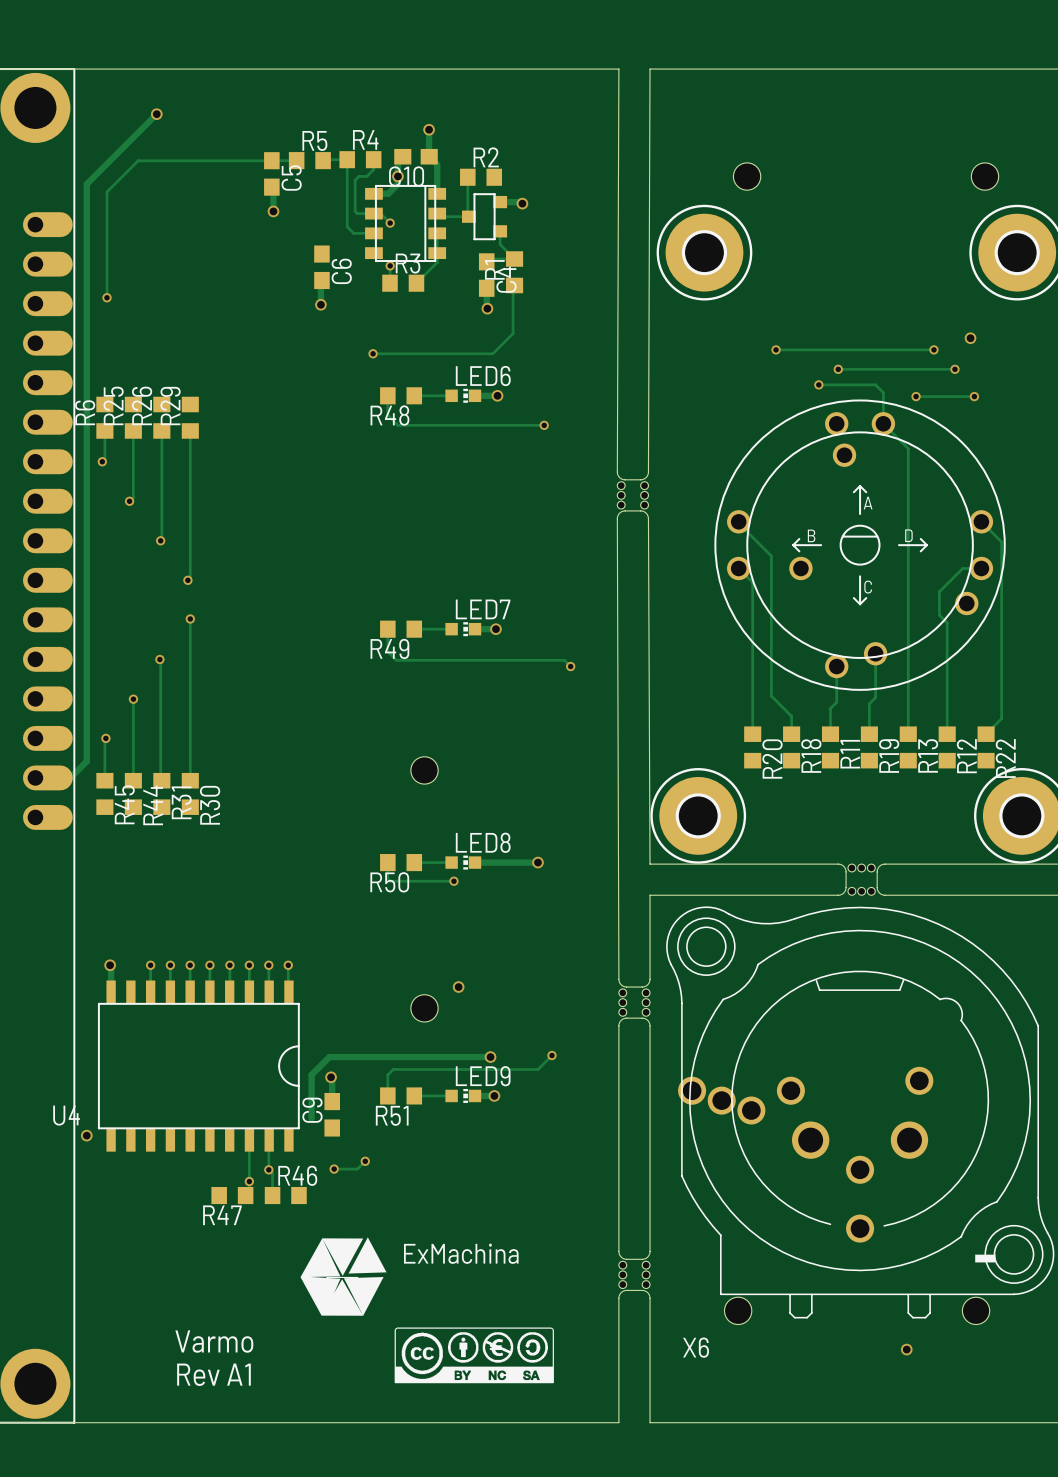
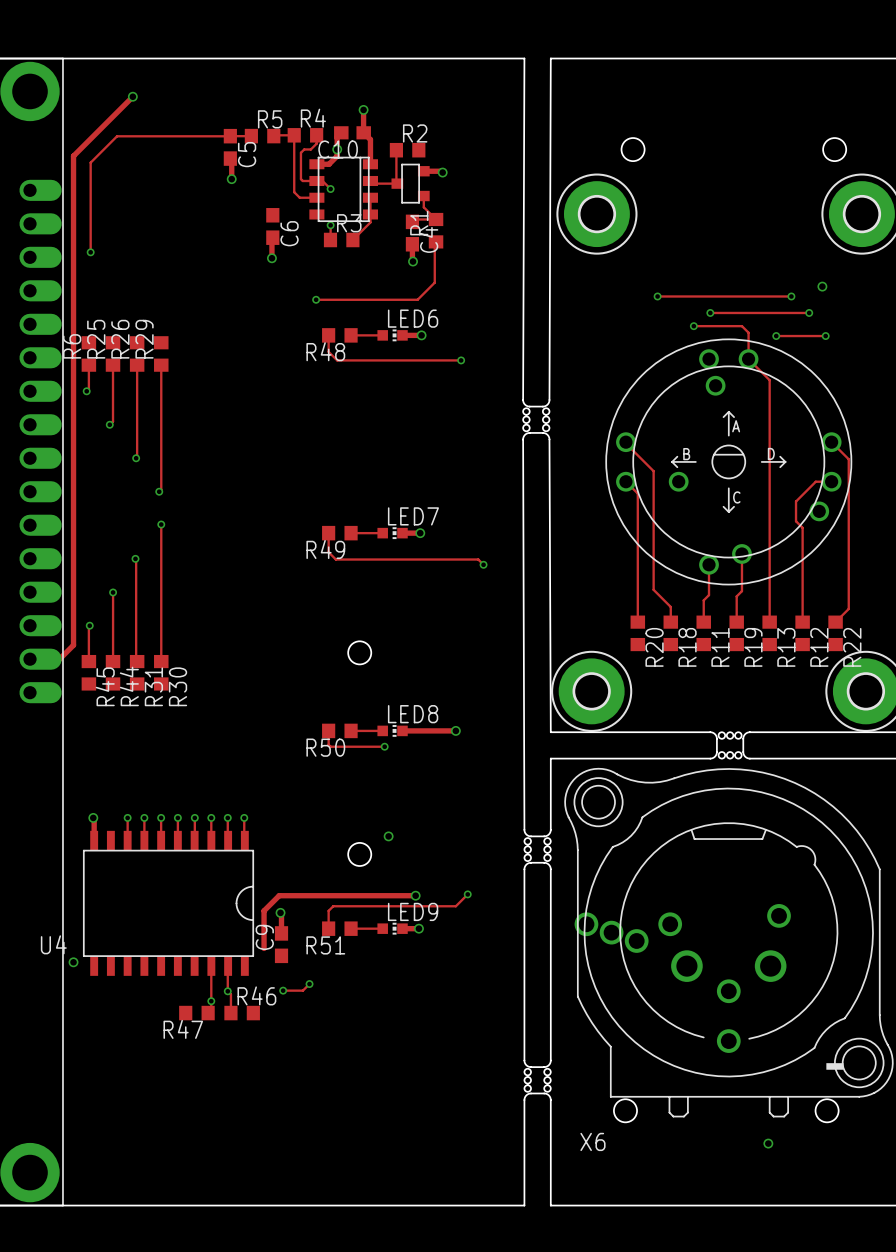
drawing: [300, 1237, 554, 1384] -> none
text: Varmo (214, 1341) -> none
text: Rev A1 (213, 1374) -> none

